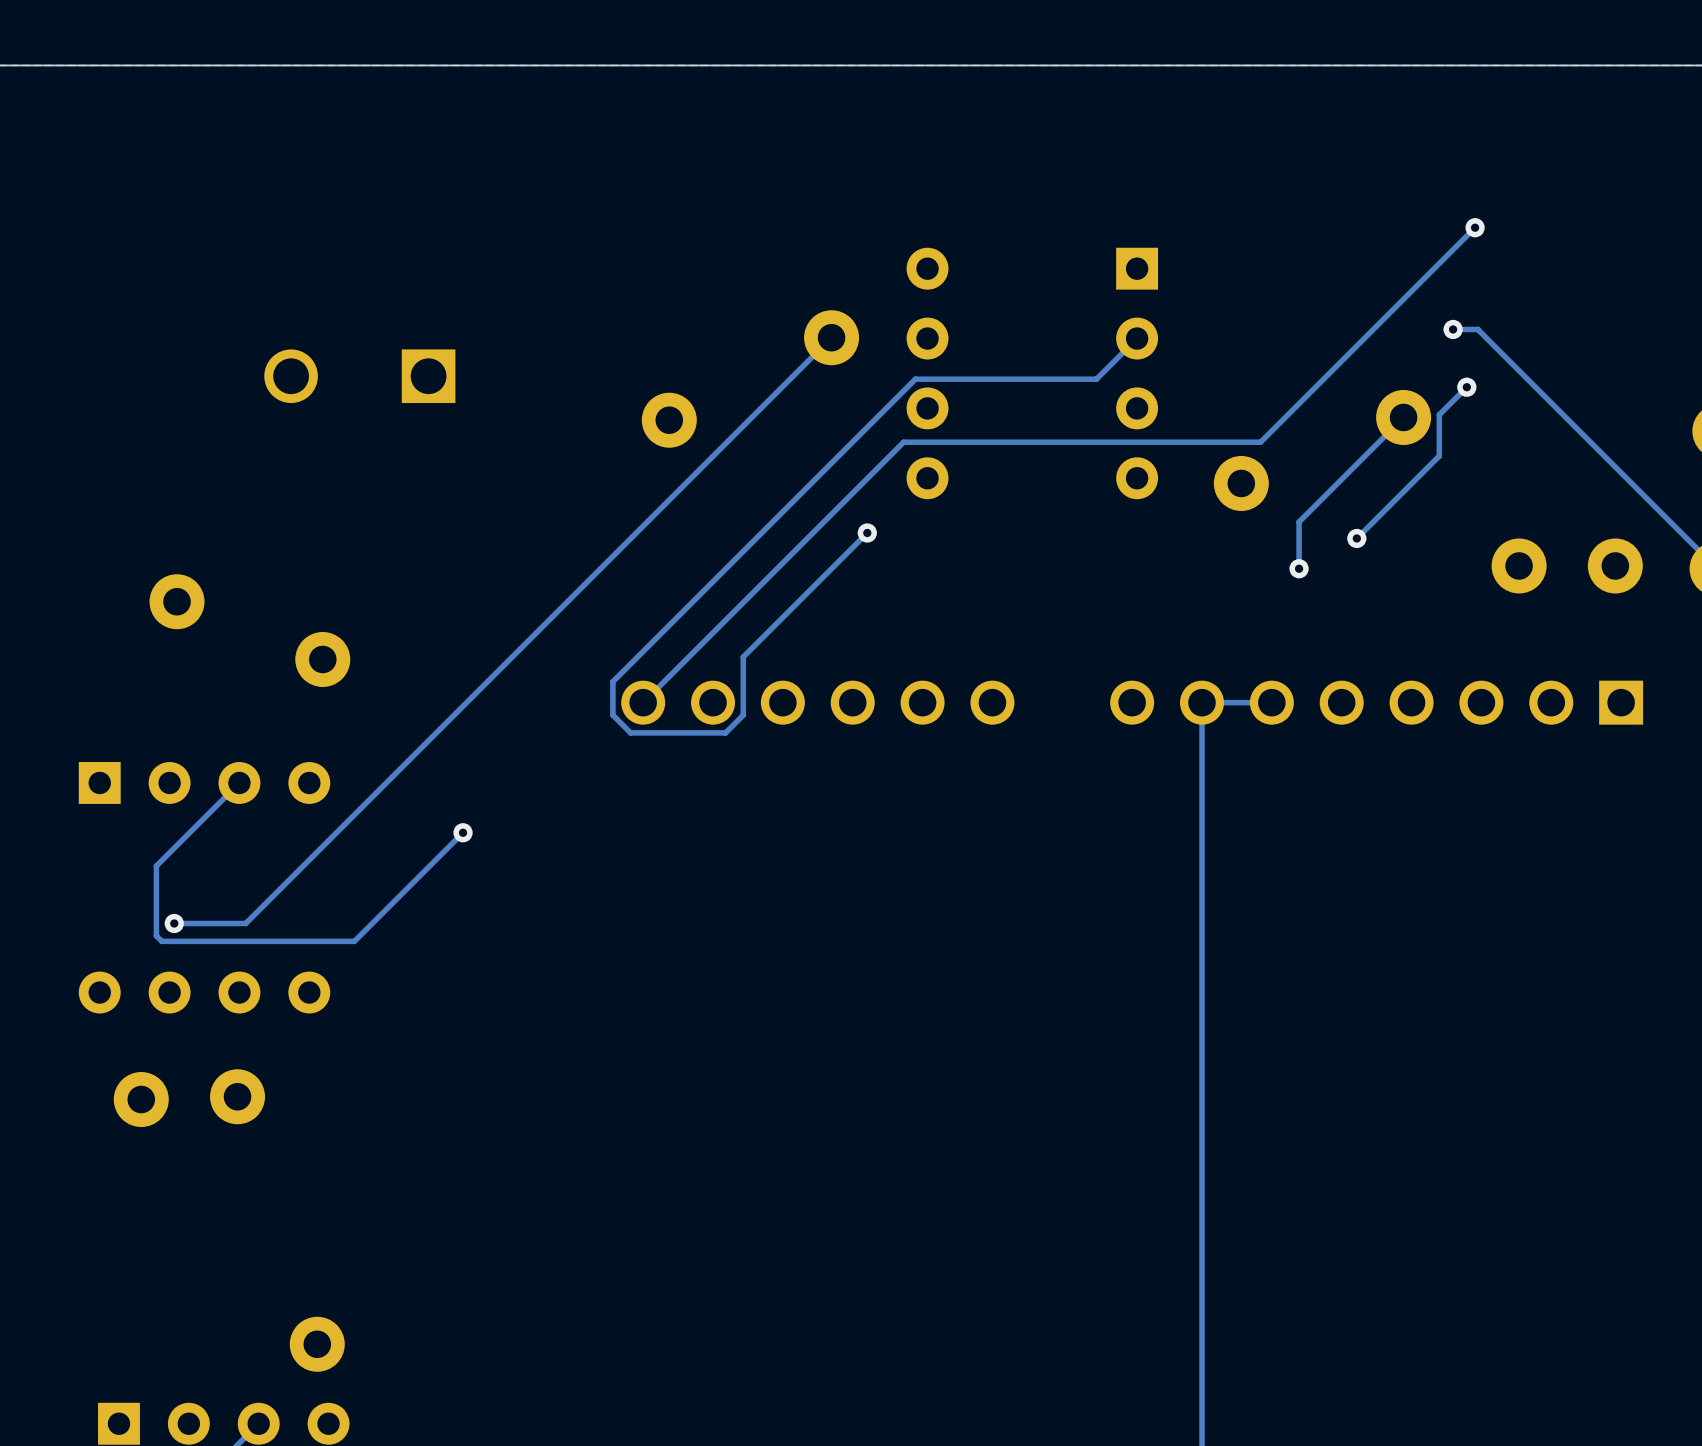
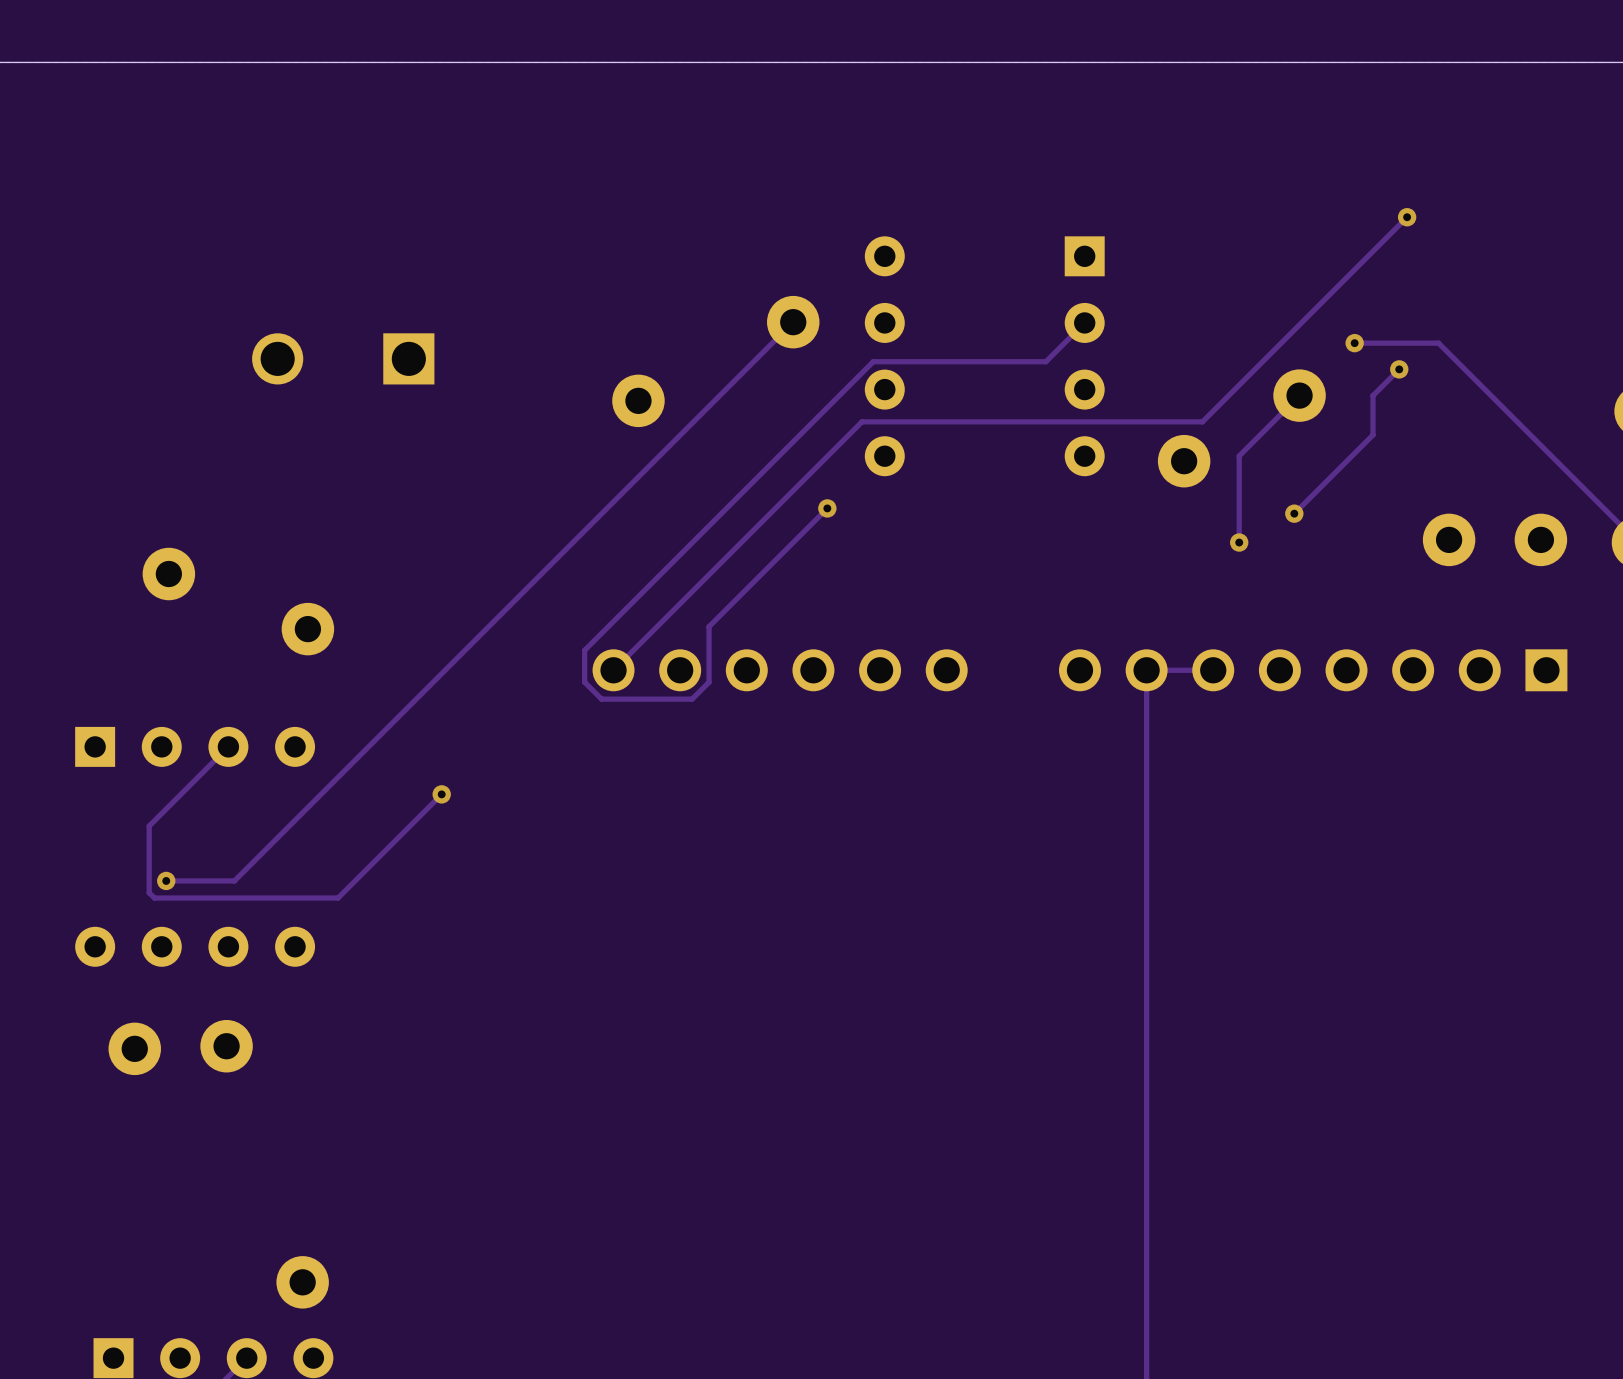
track: (1453, 329) (1477, 329) (1508, 359) -> (1354, 343) (1438, 343)
via position: (1453, 329) -> (1354, 343)
track: (1403, 417) (1299, 521) -> (1299, 395) (1239, 455) (1239, 497)
part position: (1403, 417) -> (1299, 395)

